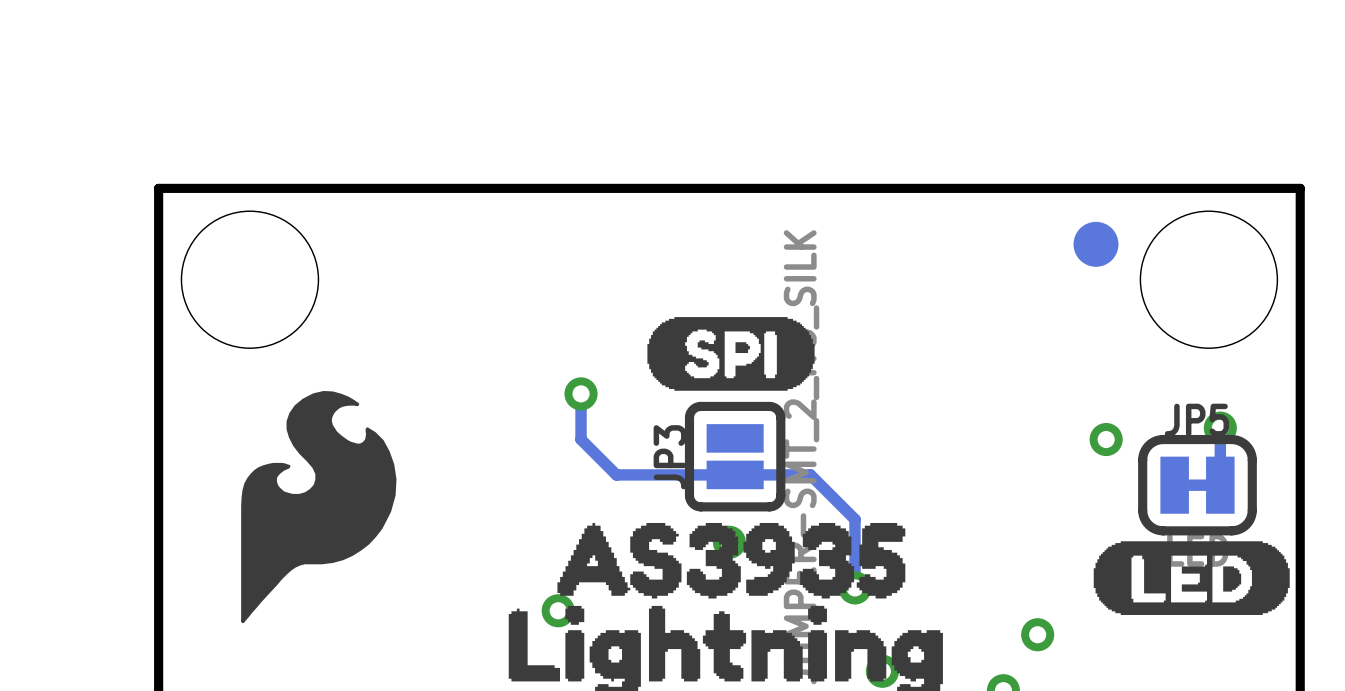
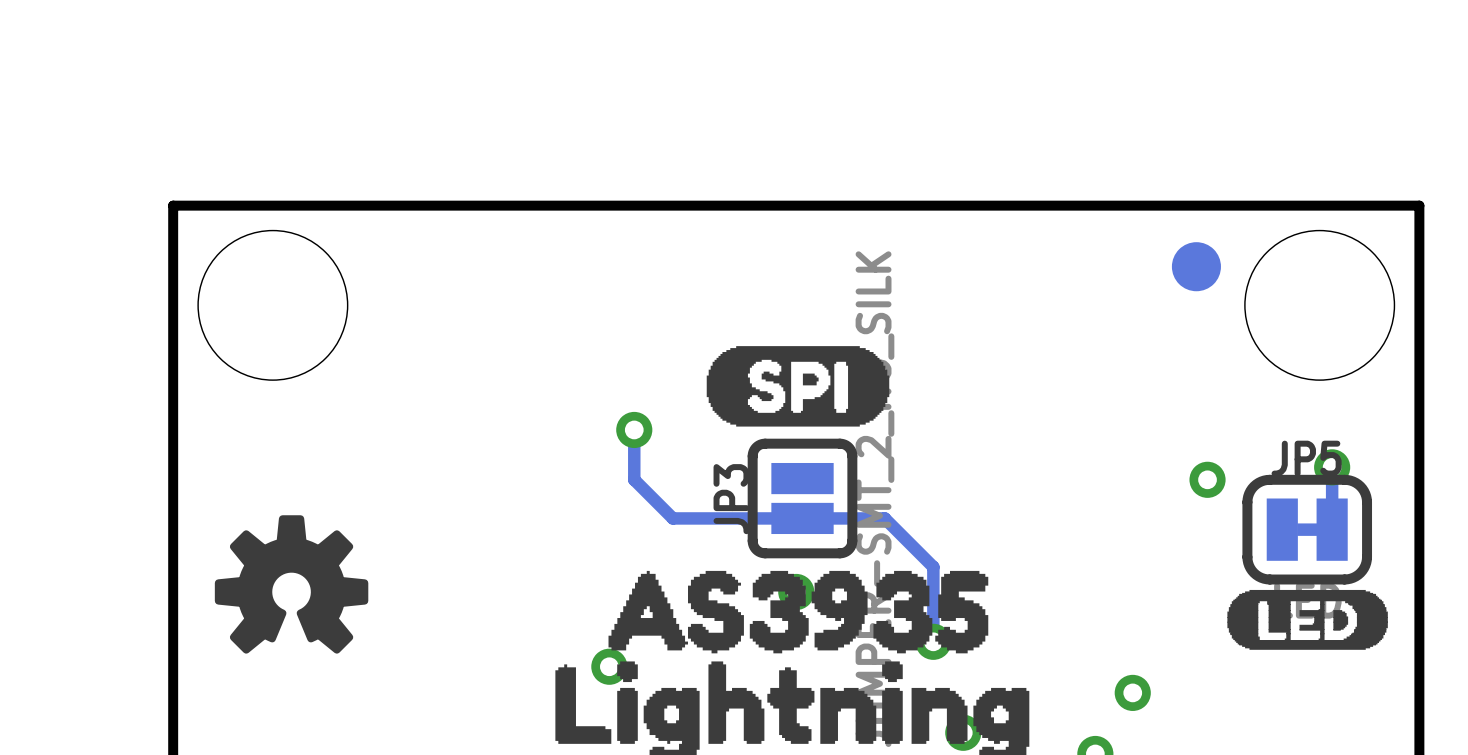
drawing: [241, 390, 397, 624] -> none
drawing: none -> [214, 515, 369, 654]
drawing shape: [1093, 541, 1290, 615] -> [1227, 589, 1388, 650]

